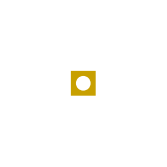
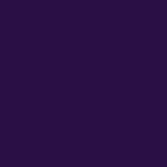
part: (83, 83) -> none

